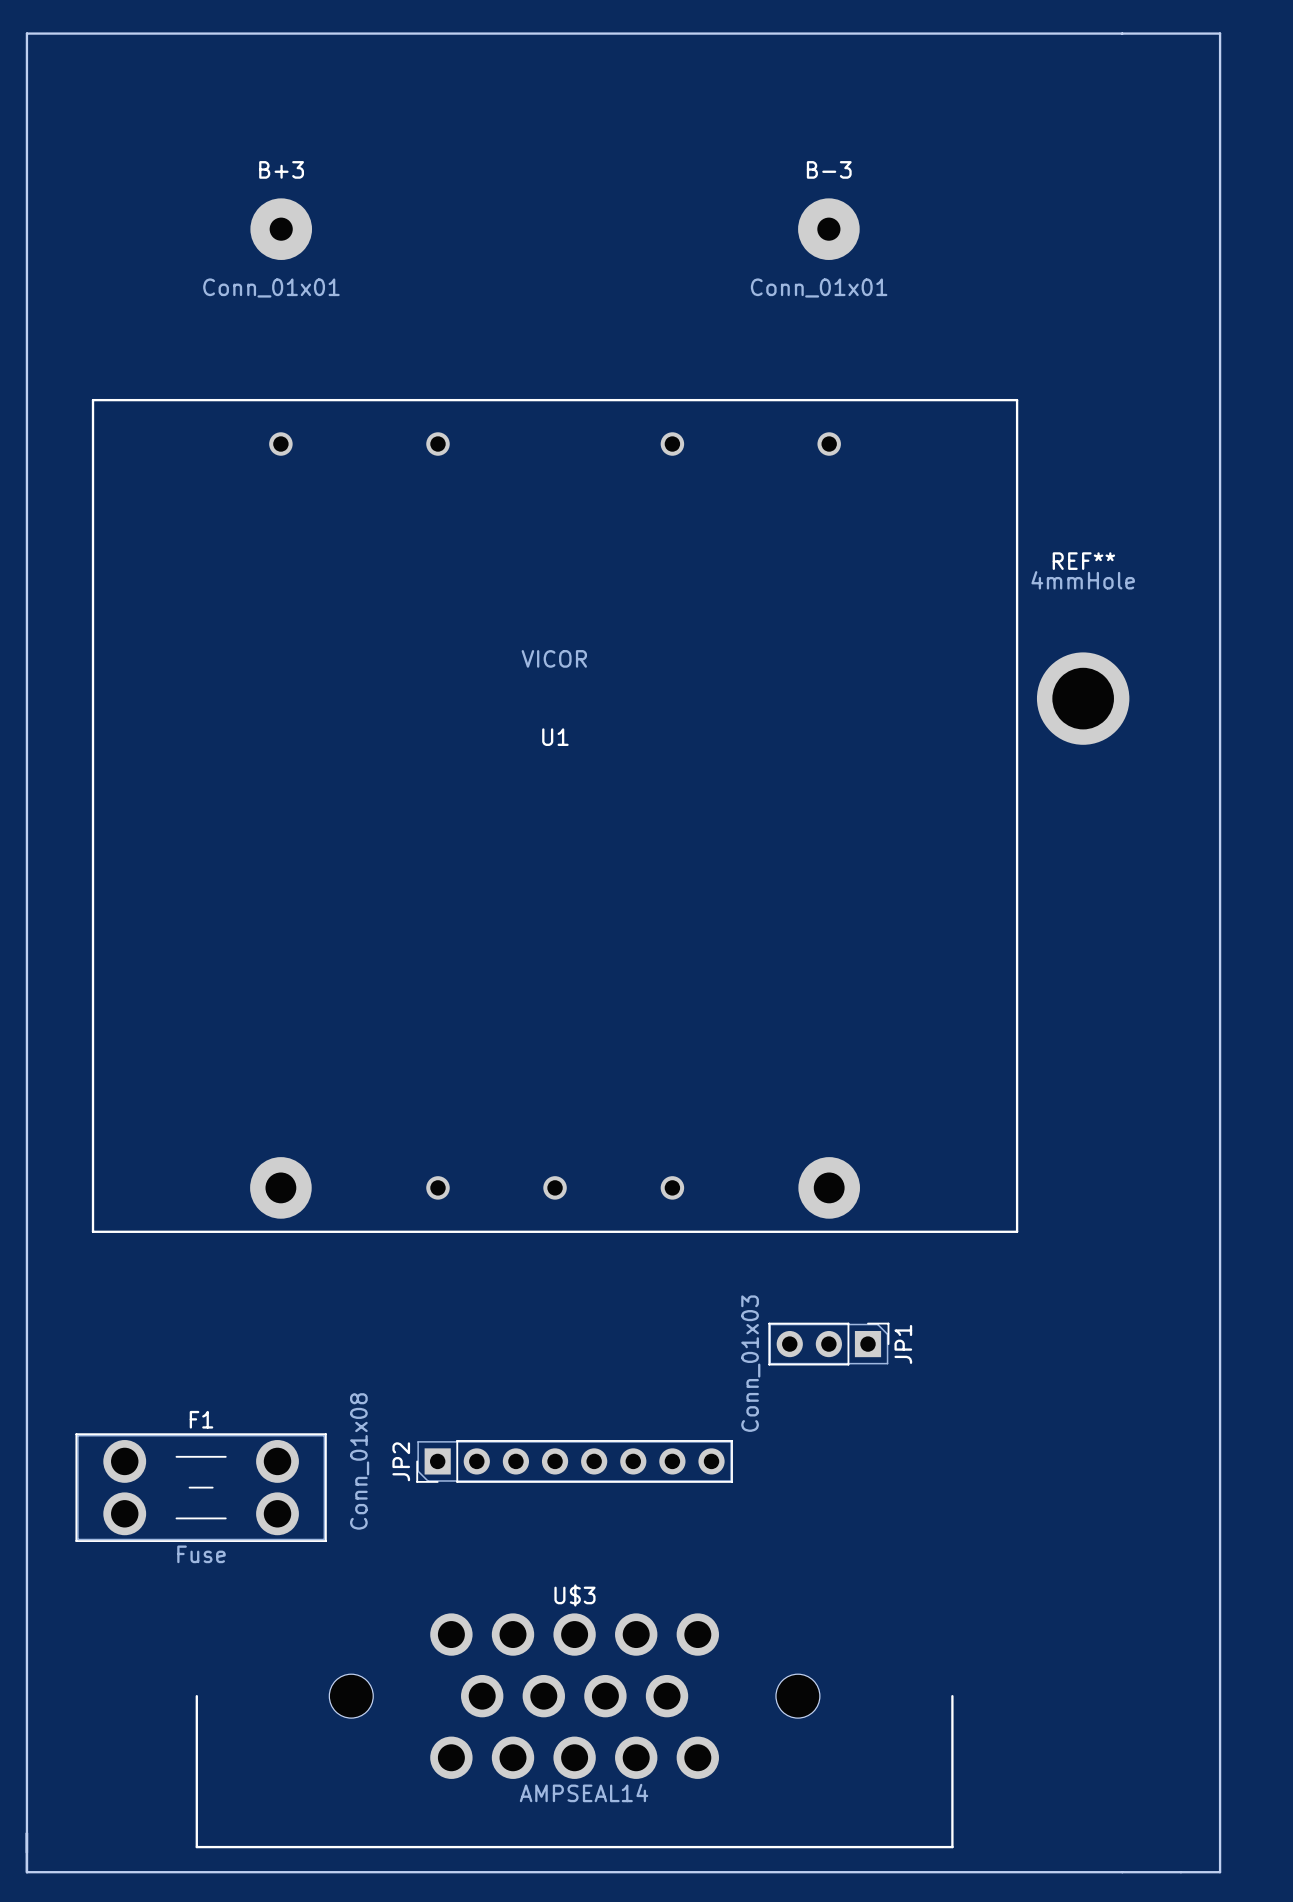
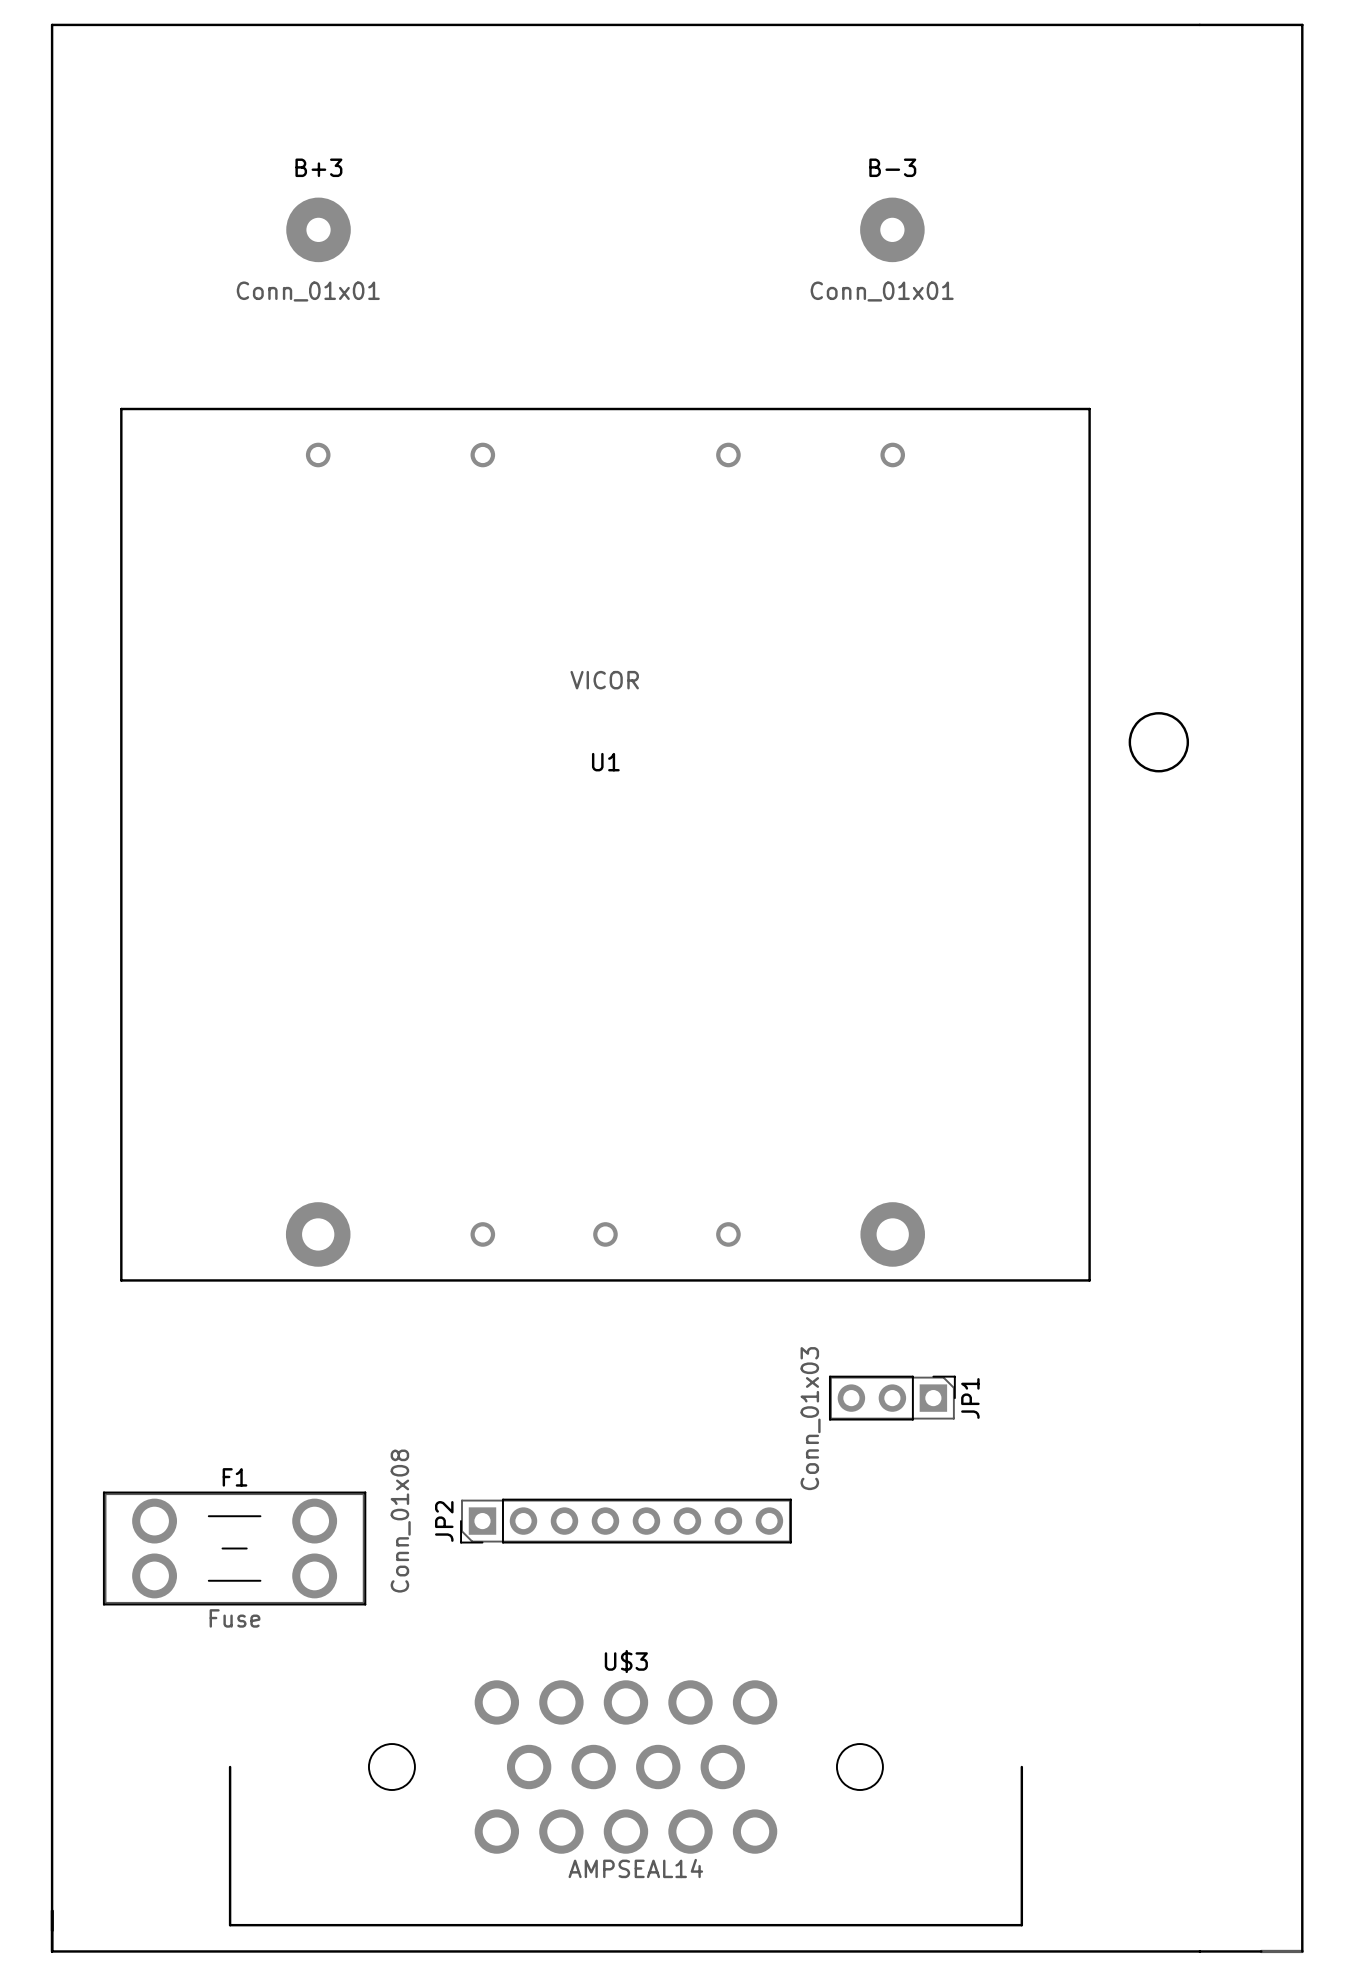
round board edge: none -> [1128, 712, 1190, 773]
REF**: 4mmHole (1083, 698) -> none
board edge: (1180, 1872) (1220, 1872) -> none
line: none -> (1261, 1951) (1302, 1951)

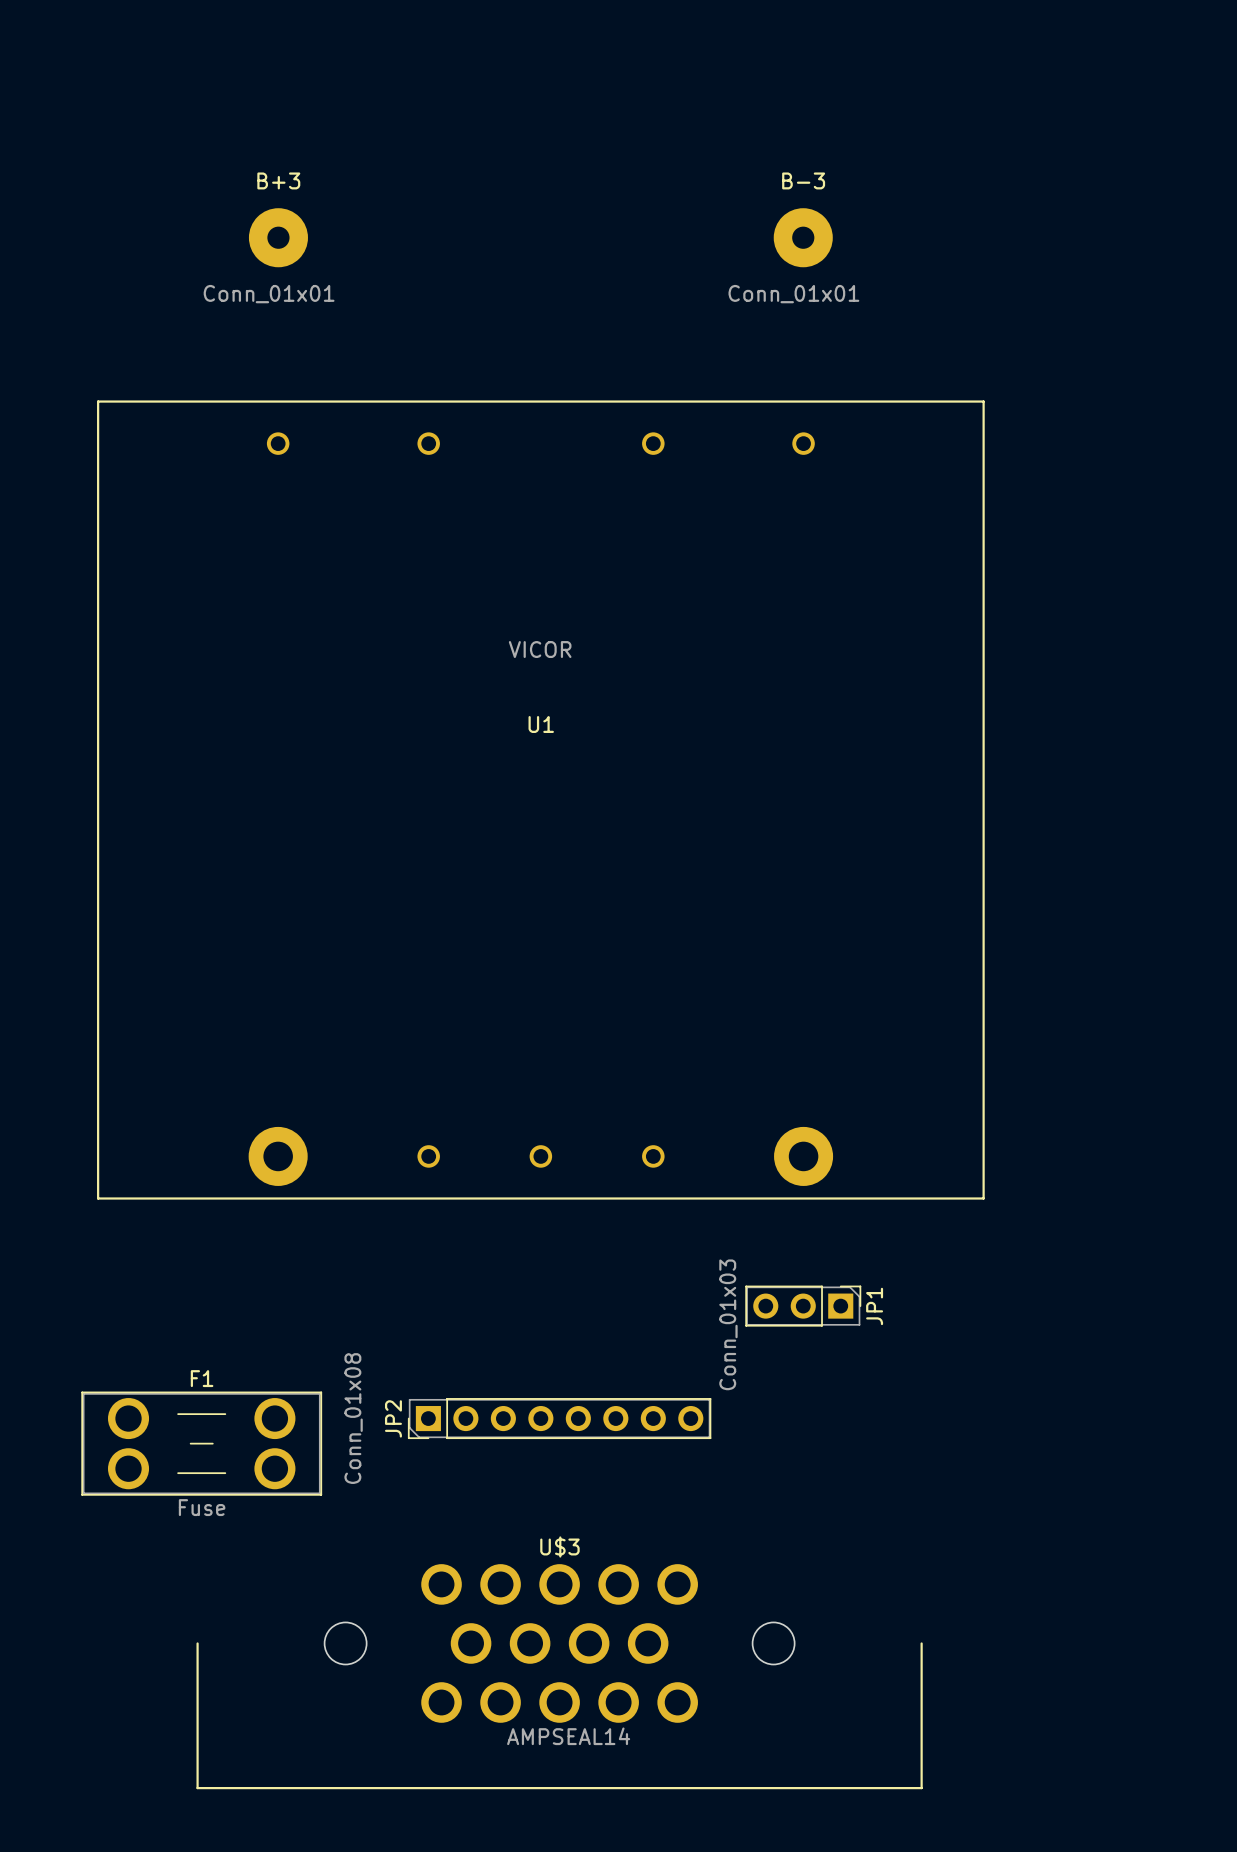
round board edge: [1128, 712, 1190, 773] -> none
board edge: (1261, 1951) (52, 1951) (52, 24) (1302, 24) (1302, 1951) -> none
line: (1261, 1951) (1302, 1951) -> none

